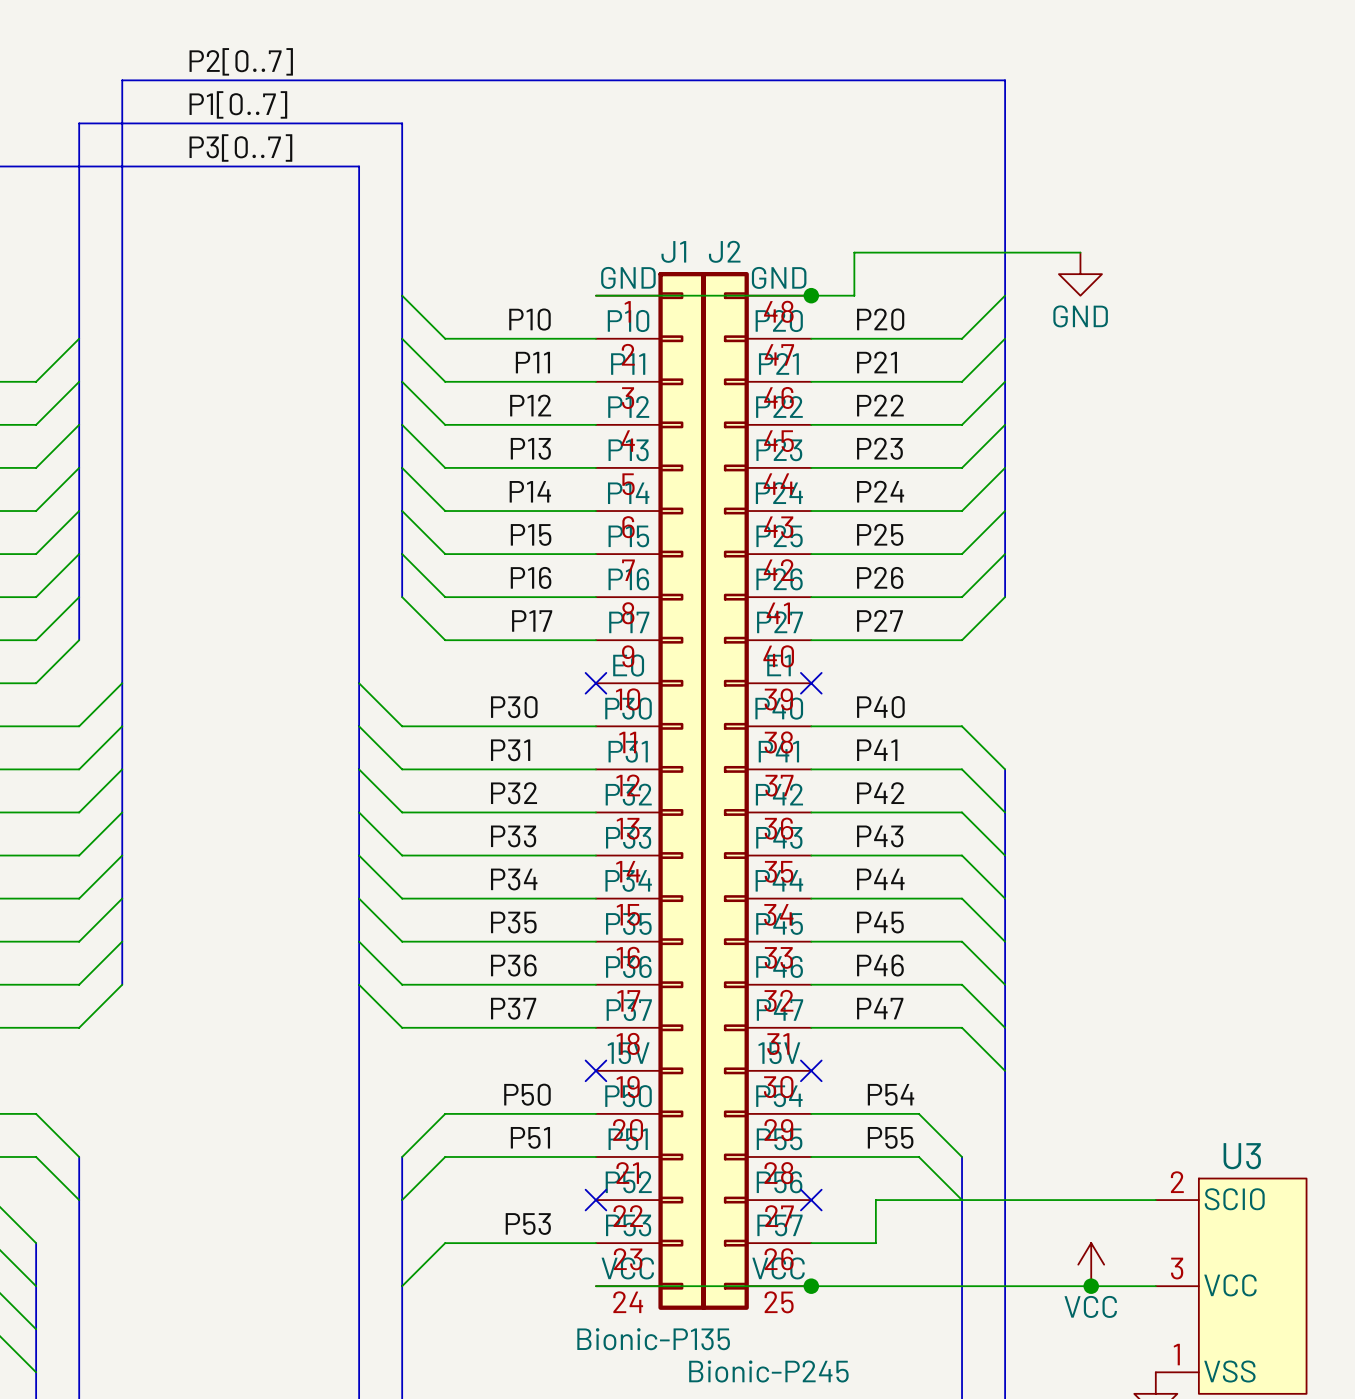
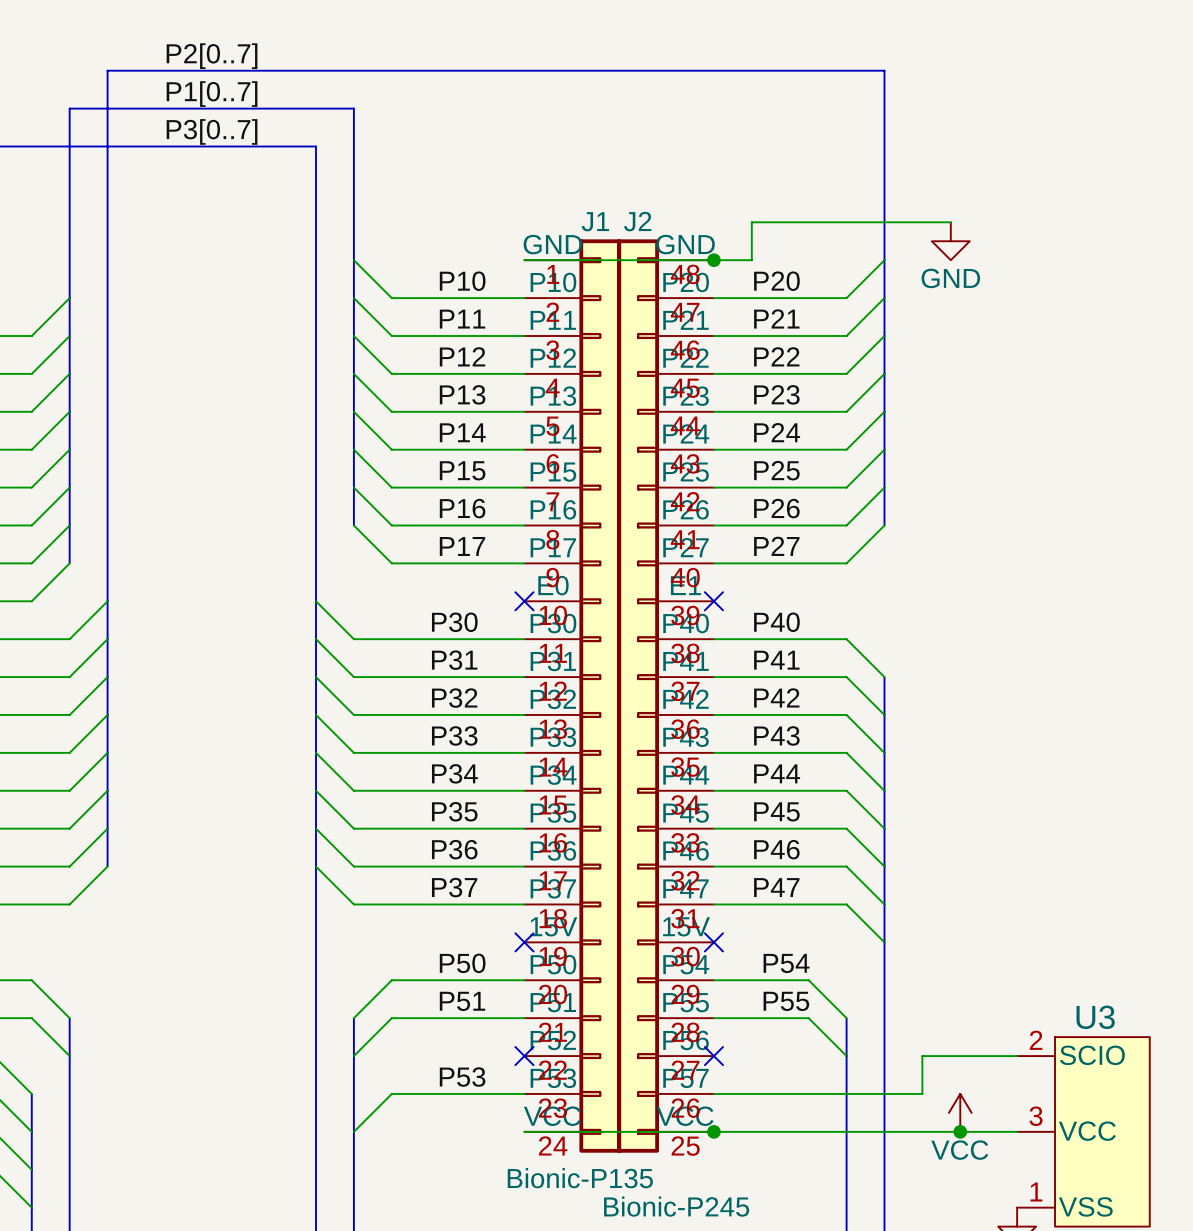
wire: (1048, 1200) (875, 1200) (875, 1243) -> (922, 1056) (922, 1093) (770, 1093)

